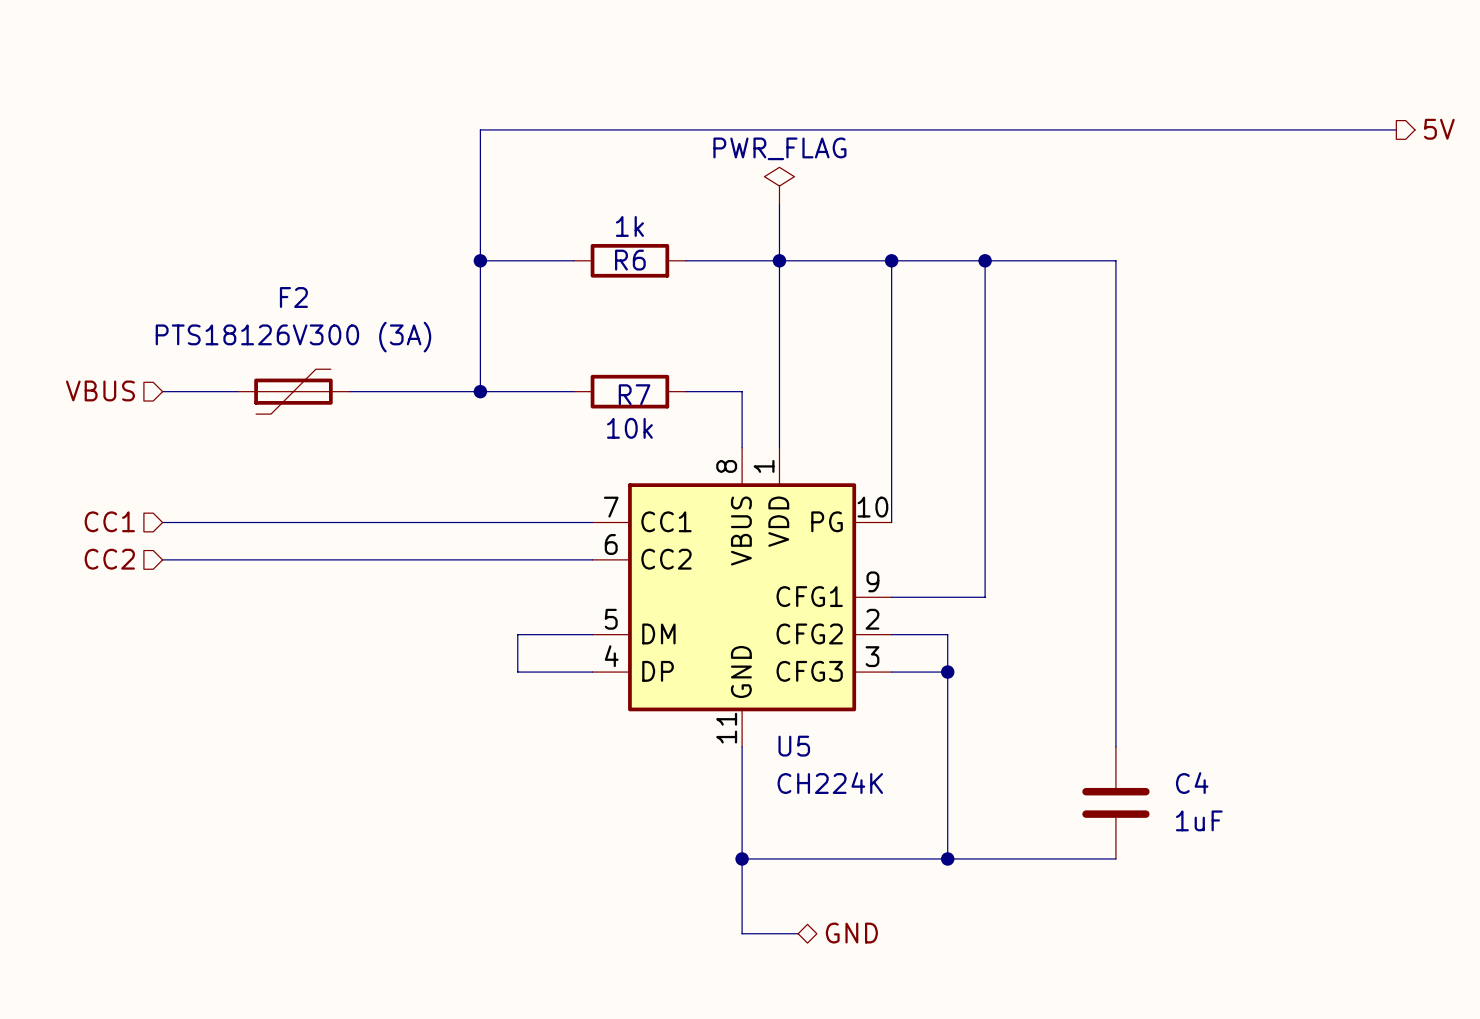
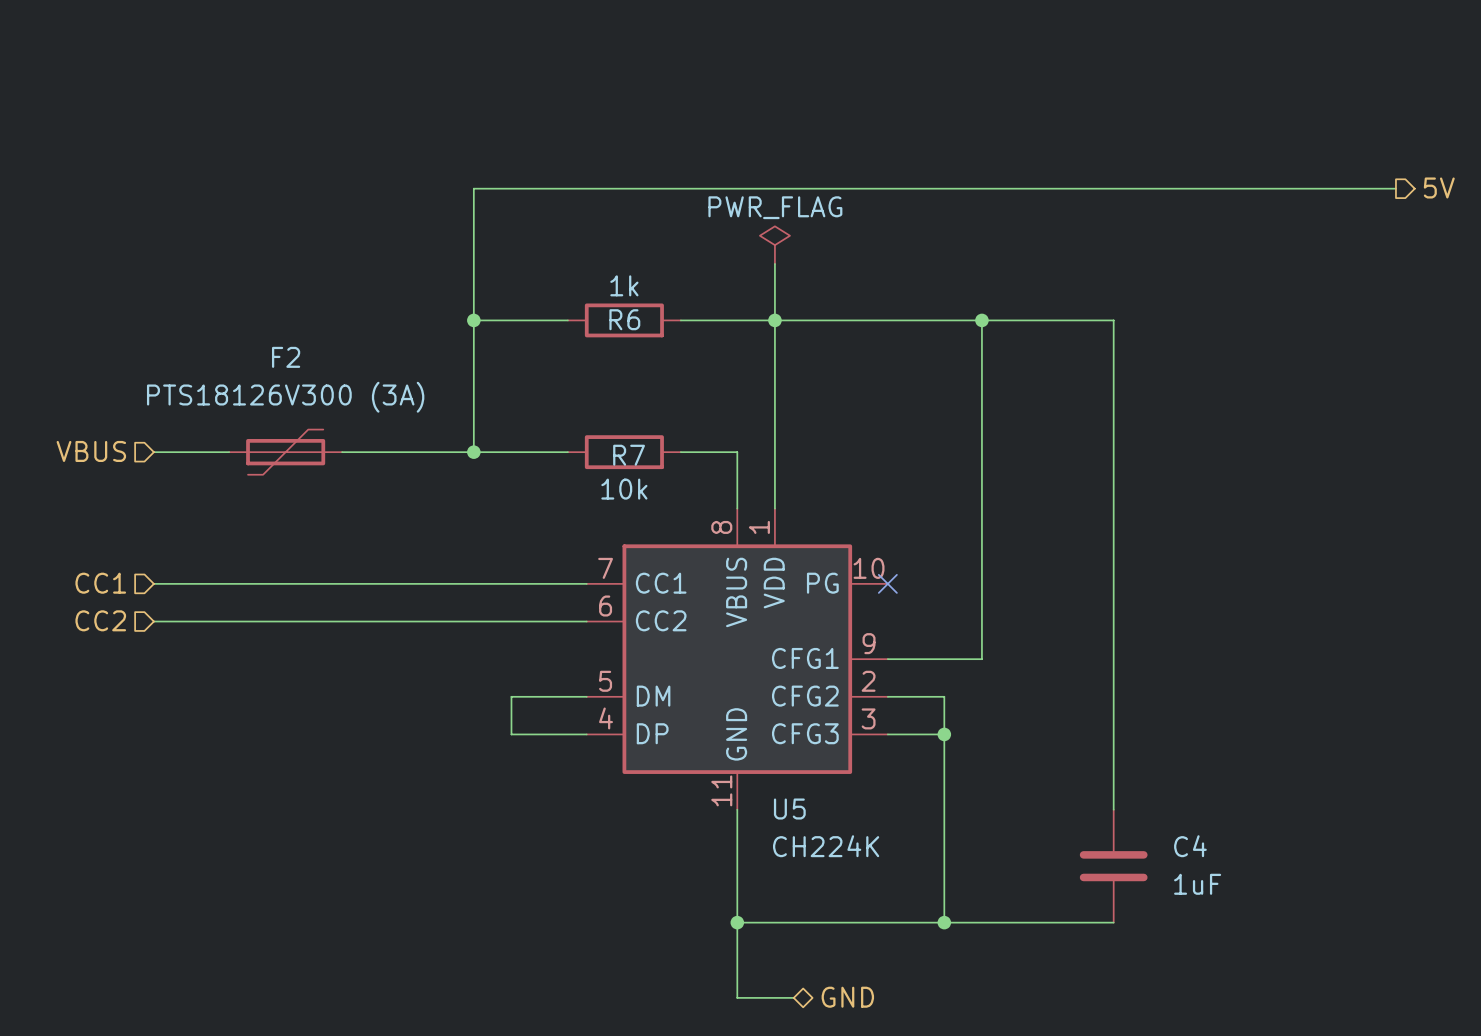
wire: (891, 260) (891, 522) -> none
junction: (891, 260) -> none
no-connect mark: none -> (887, 583)

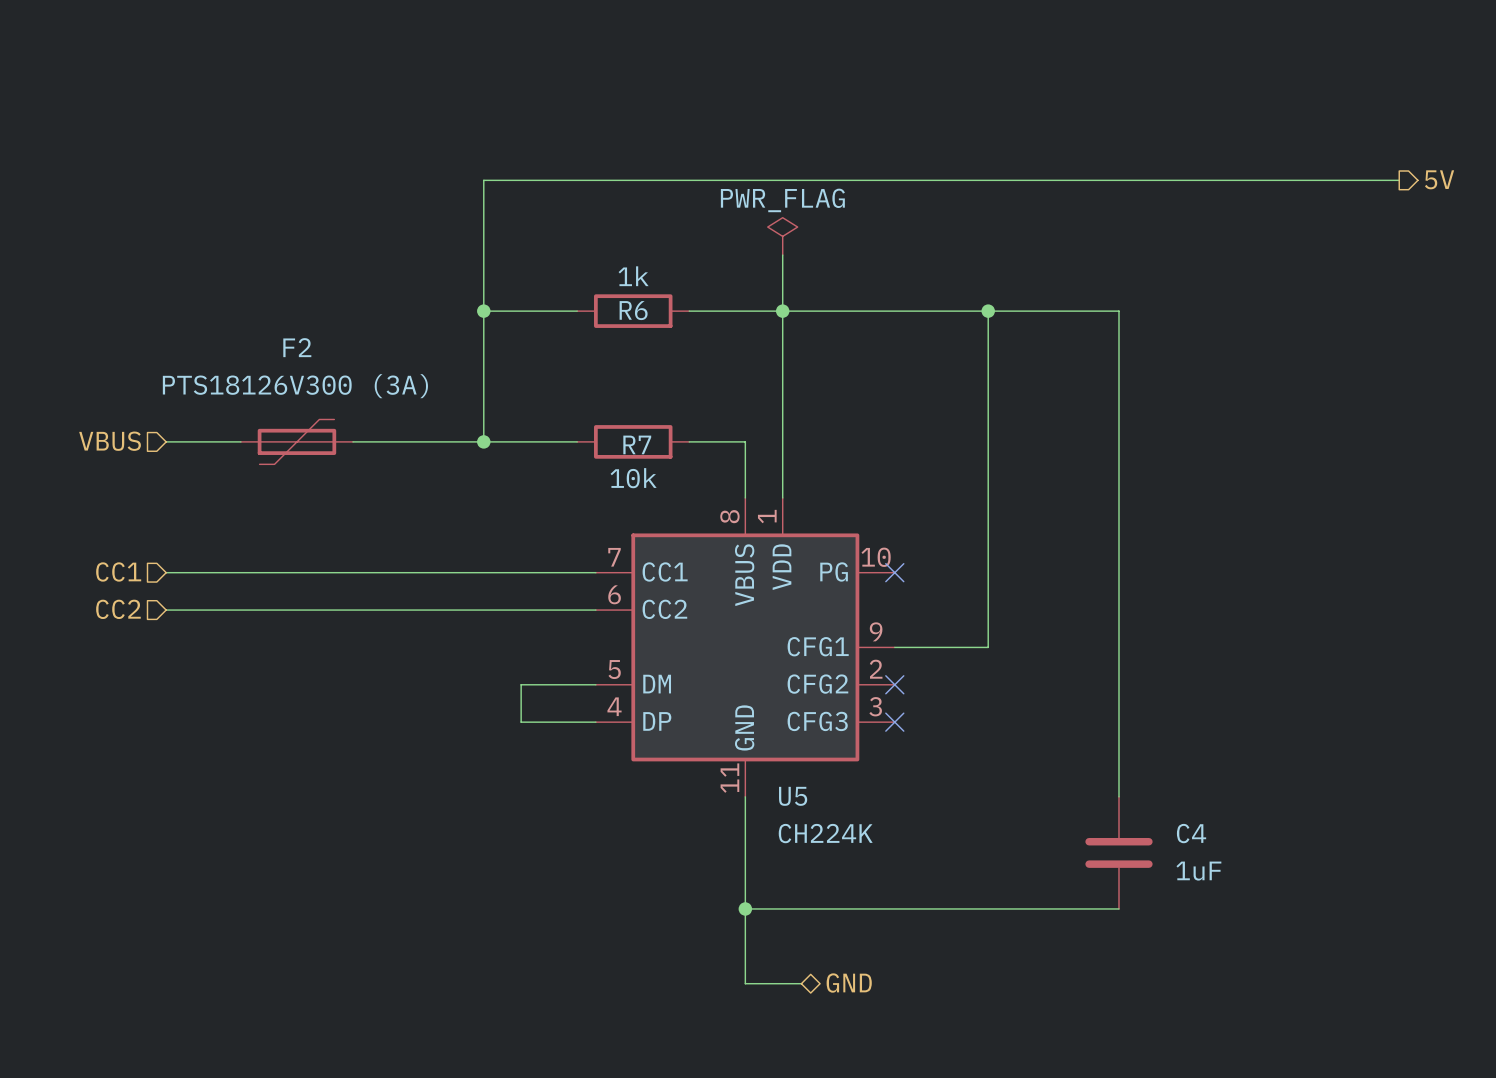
wire: (887, 696) (944, 696) (944, 922) -> none
no-connect mark: none -> (894, 684)
wire: (887, 734) (944, 734) -> none
no-connect mark: none -> (894, 722)
junction: (944, 734) -> none
junction: (944, 922) -> none

